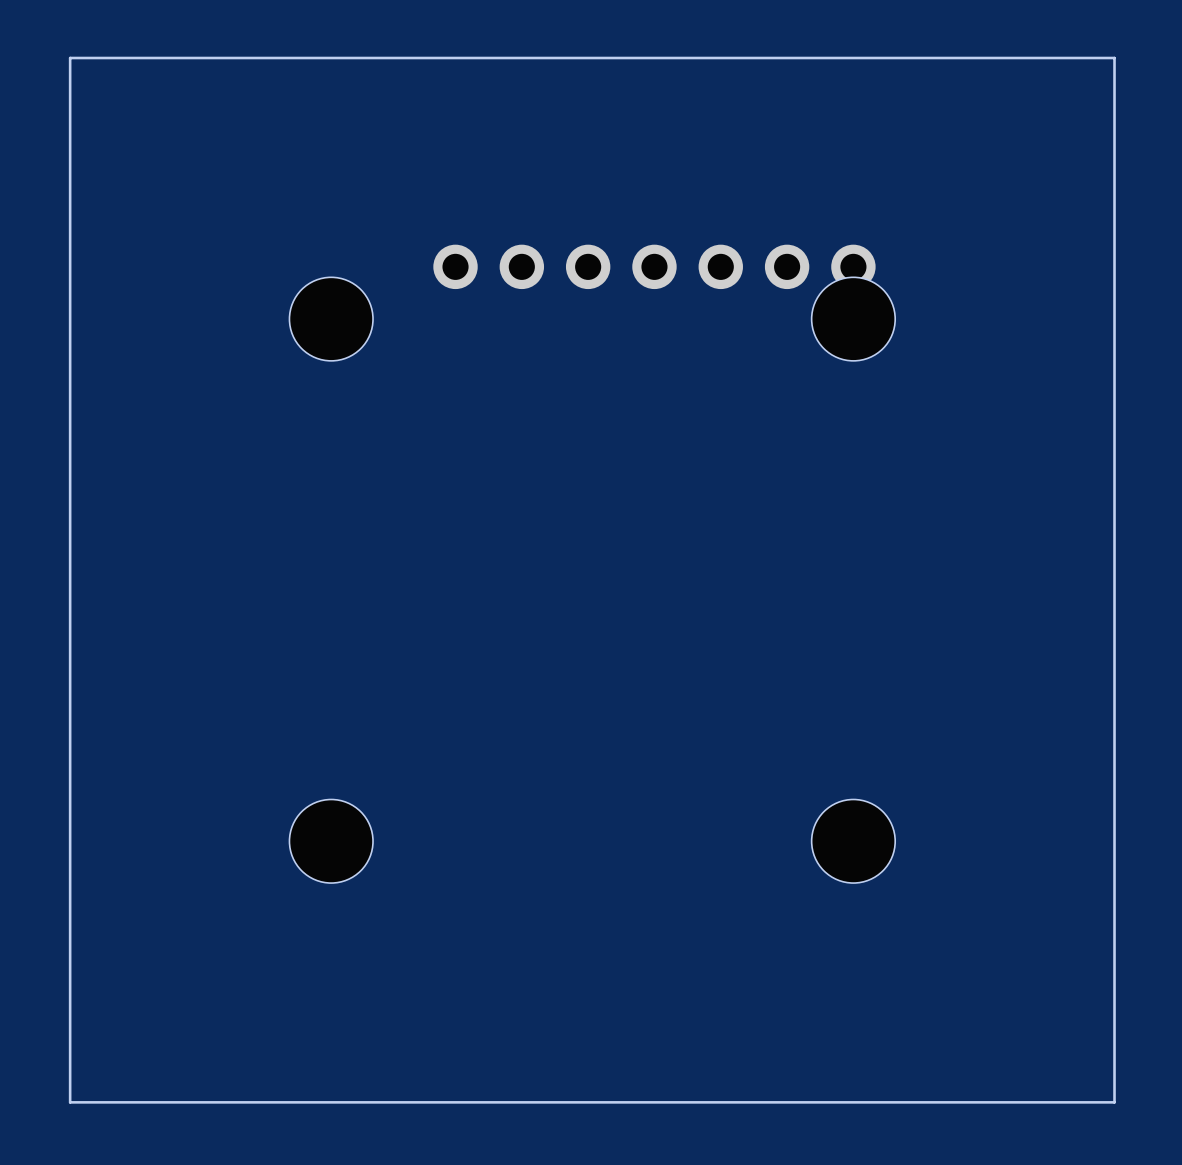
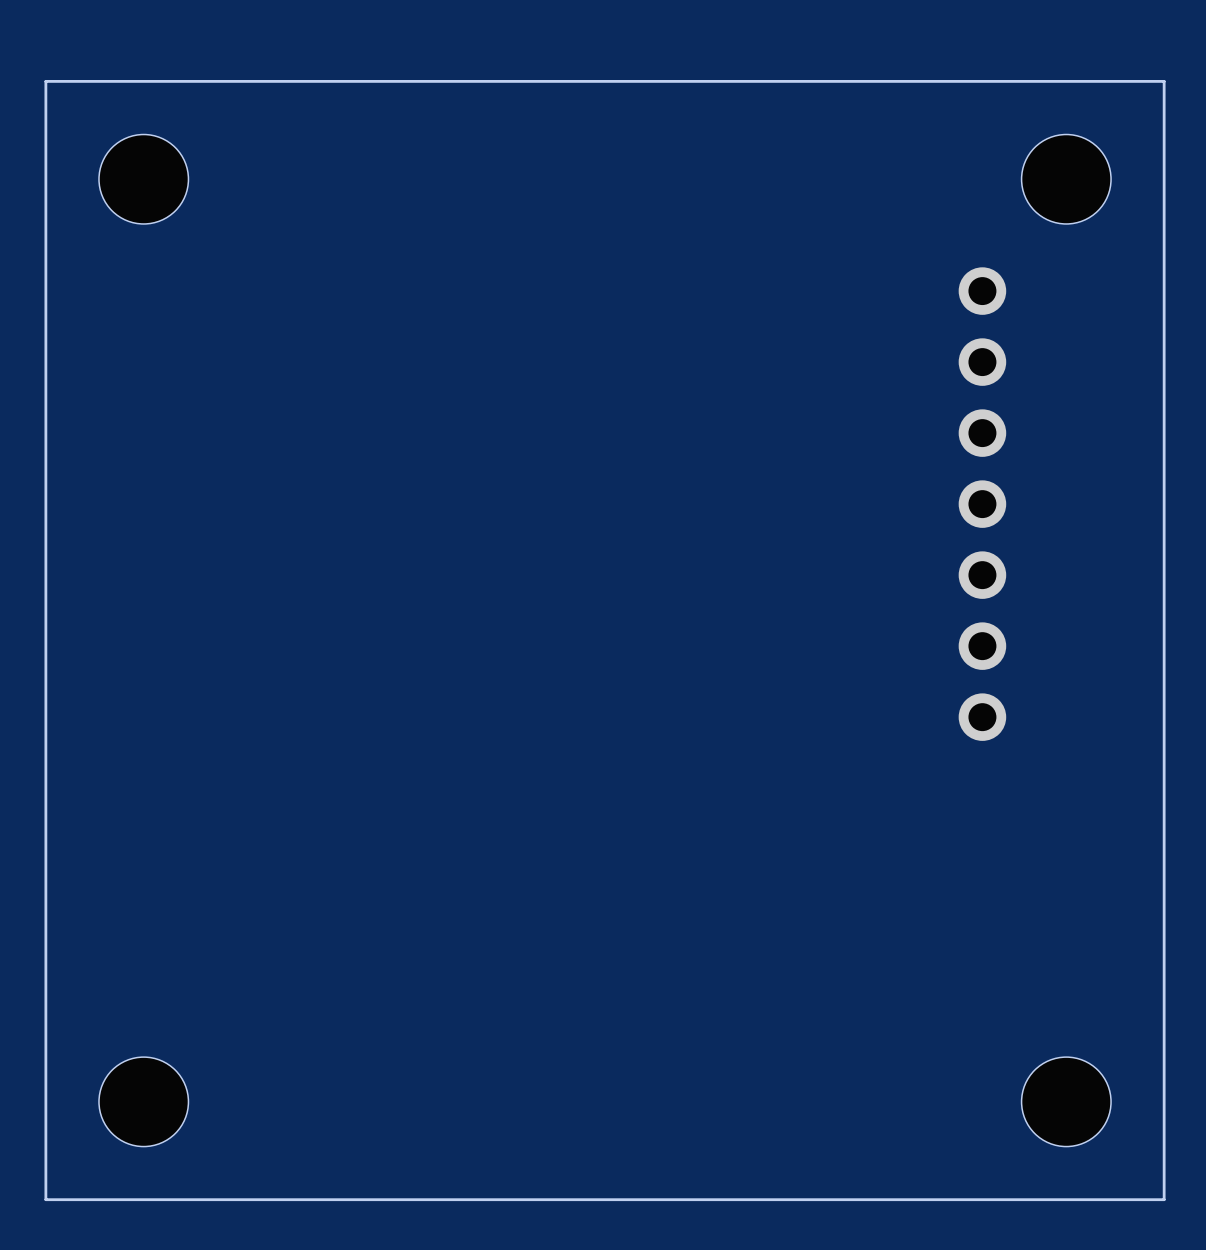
part rotation: 0° (654, 266) -> 90° clockwise (982, 504)
part position: (654, 266) -> (982, 504)
part position: (331, 319) -> (143, 179)
part position: (853, 319) -> (1066, 179)
part position: (331, 841) -> (143, 1101)
part position: (853, 841) -> (1066, 1101)

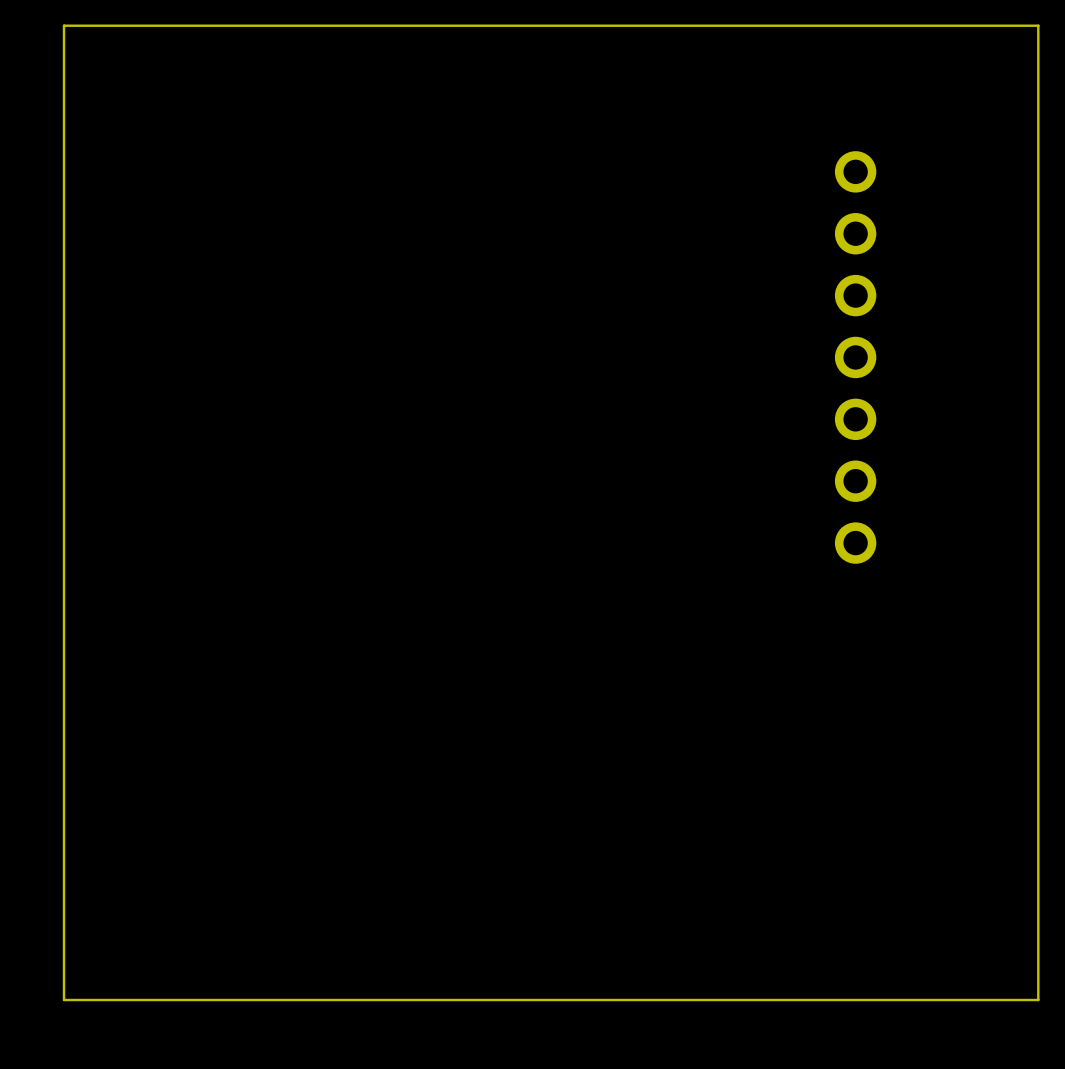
part: (143, 179) -> none
part: (1066, 179) -> none
part position: (982, 504) -> (855, 357)
part: (143, 1101) -> none
part: (1066, 1101) -> none

